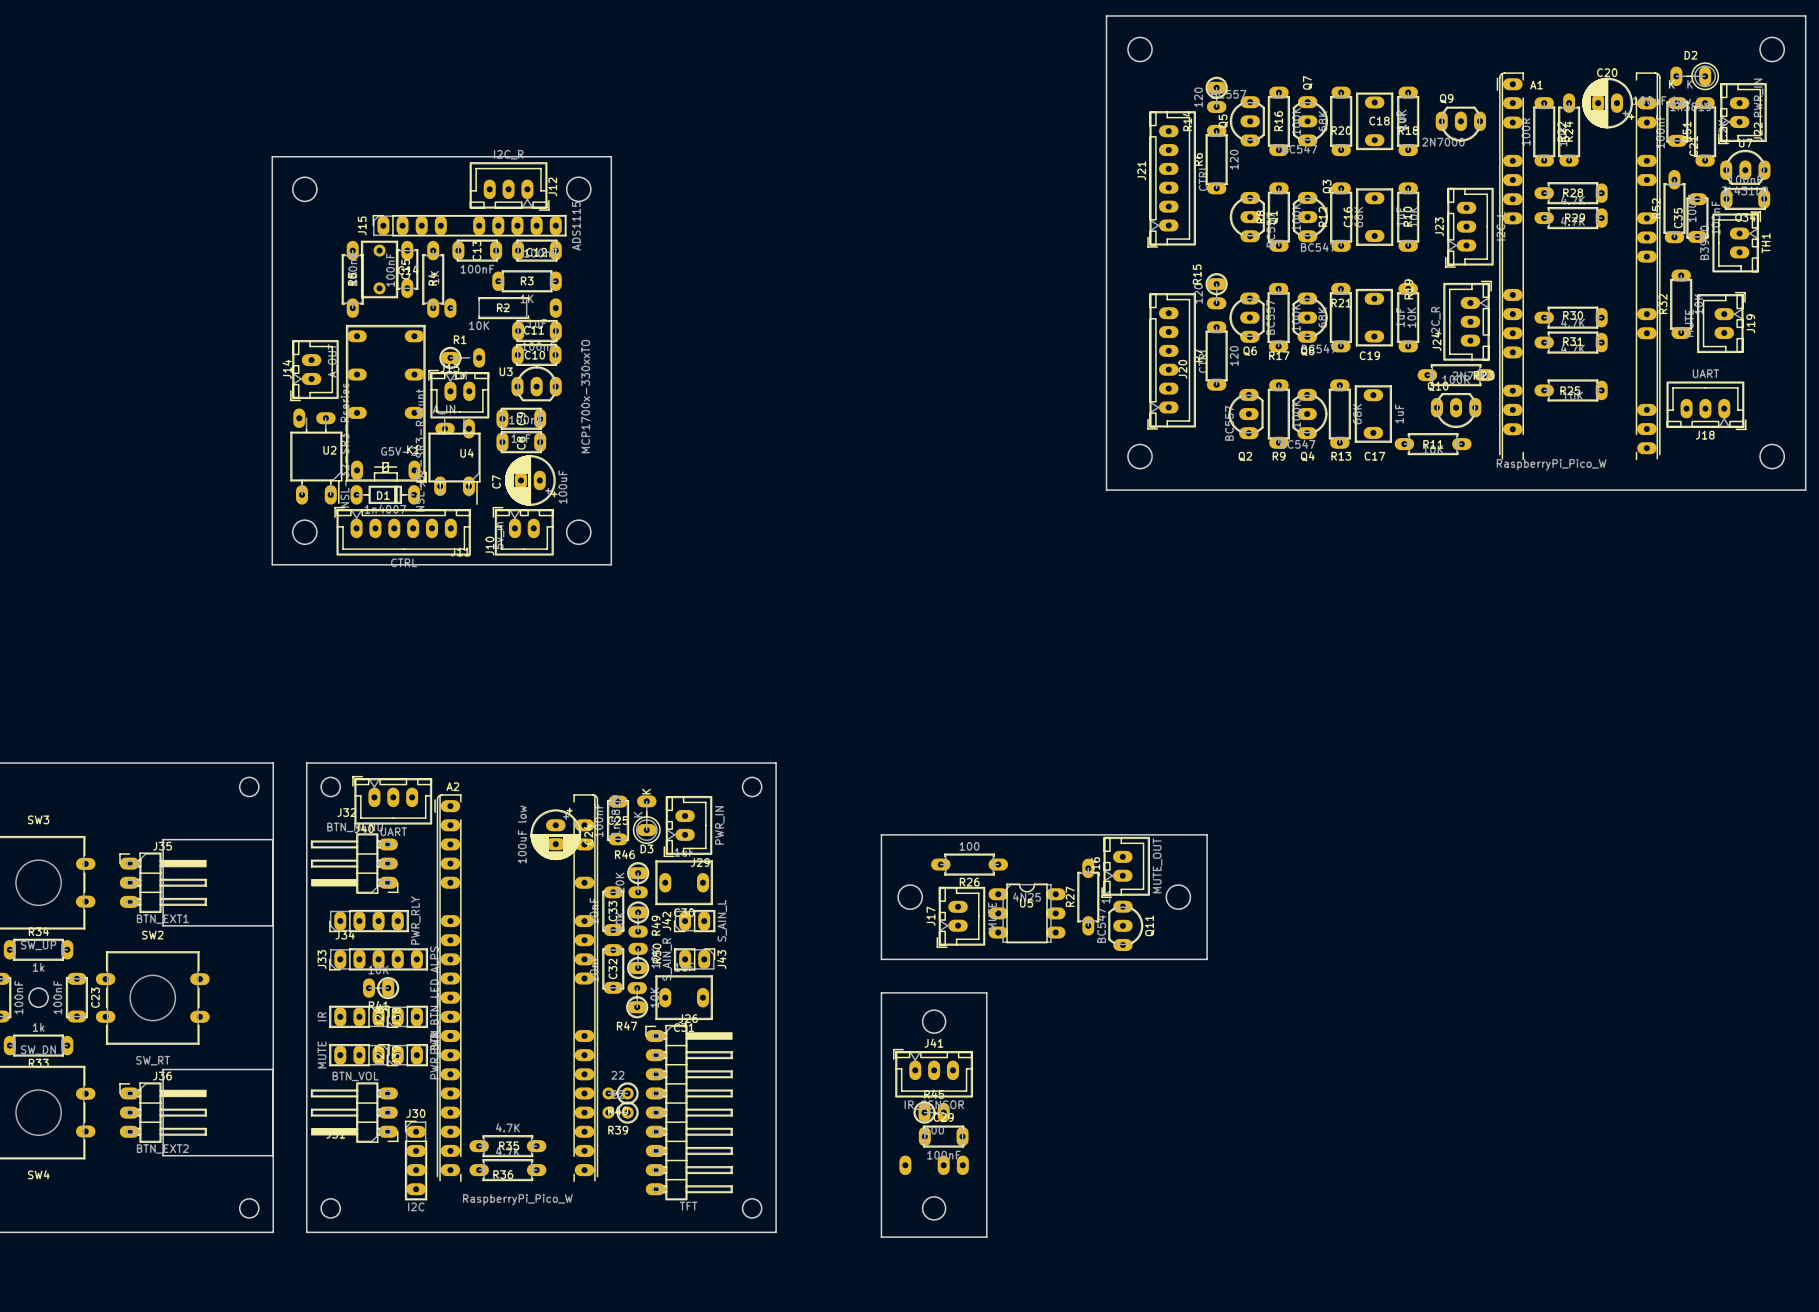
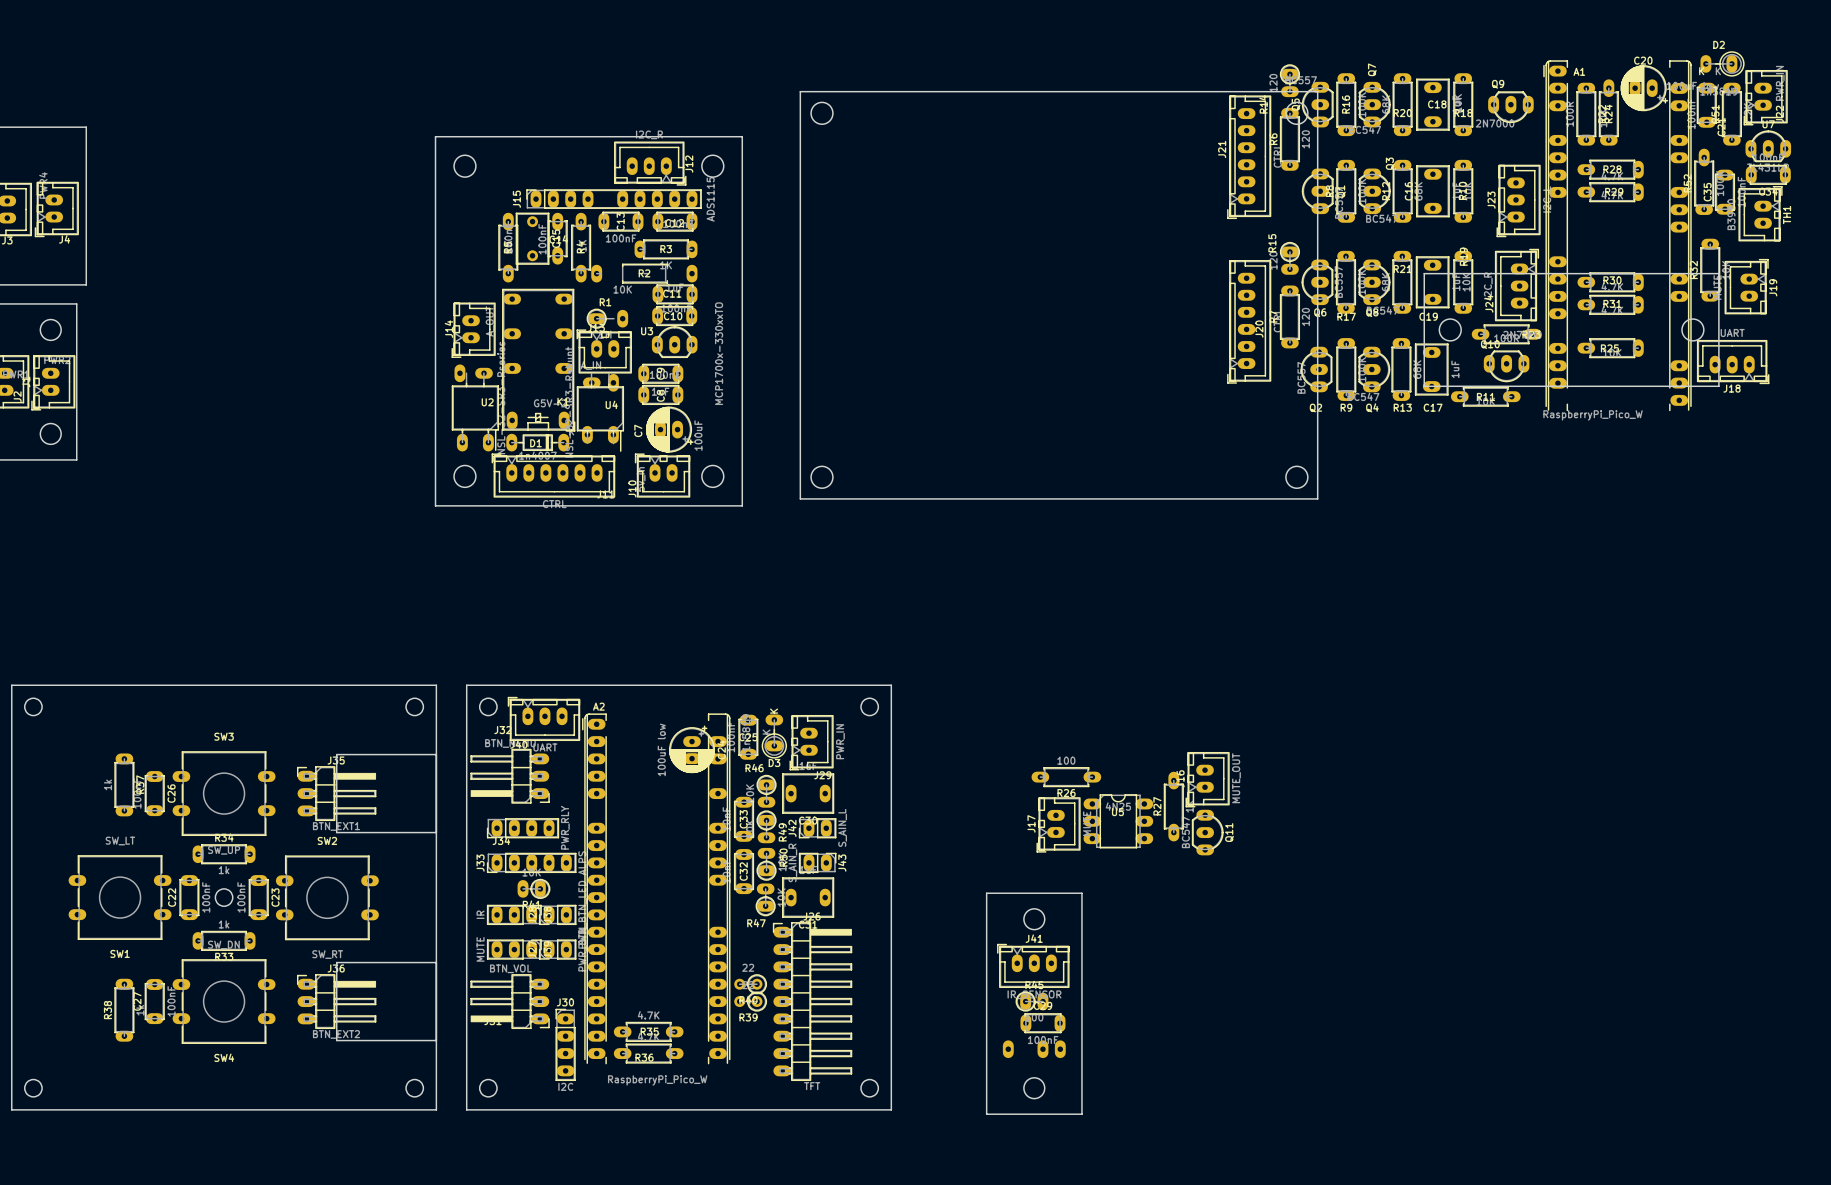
board edge: (1106, 15) (1805, 15) (1805, 490) (1106, 490) (1106, 15) -> none
round board edge: [1127, 36, 1153, 63] -> none
round board edge: [1759, 36, 1786, 63] -> none
board edge: none -> (800, 91) (1317, 91) (1317, 498) (800, 498) (800, 91)
round board edge: none -> [810, 101, 834, 125]
round board edge: none -> [1285, 101, 1309, 125]
board edge: none -> (1424, 273) (1718, 273) (1718, 386) (1424, 386) (1424, 273)
round board edge: none -> [1438, 318, 1462, 342]
round board edge: none -> [1681, 318, 1705, 342]
round board edge: [1127, 443, 1153, 470] -> none
round board edge: [1759, 443, 1786, 470] -> none
round board edge: none -> [810, 465, 834, 489]
round board edge: none -> [1285, 465, 1309, 489]
board edge: (881, 834) (1207, 834) (1207, 959) (881, 959) (881, 834) -> none
round board edge: [897, 884, 923, 910] -> none
round board edge: [1165, 884, 1192, 910] -> none

